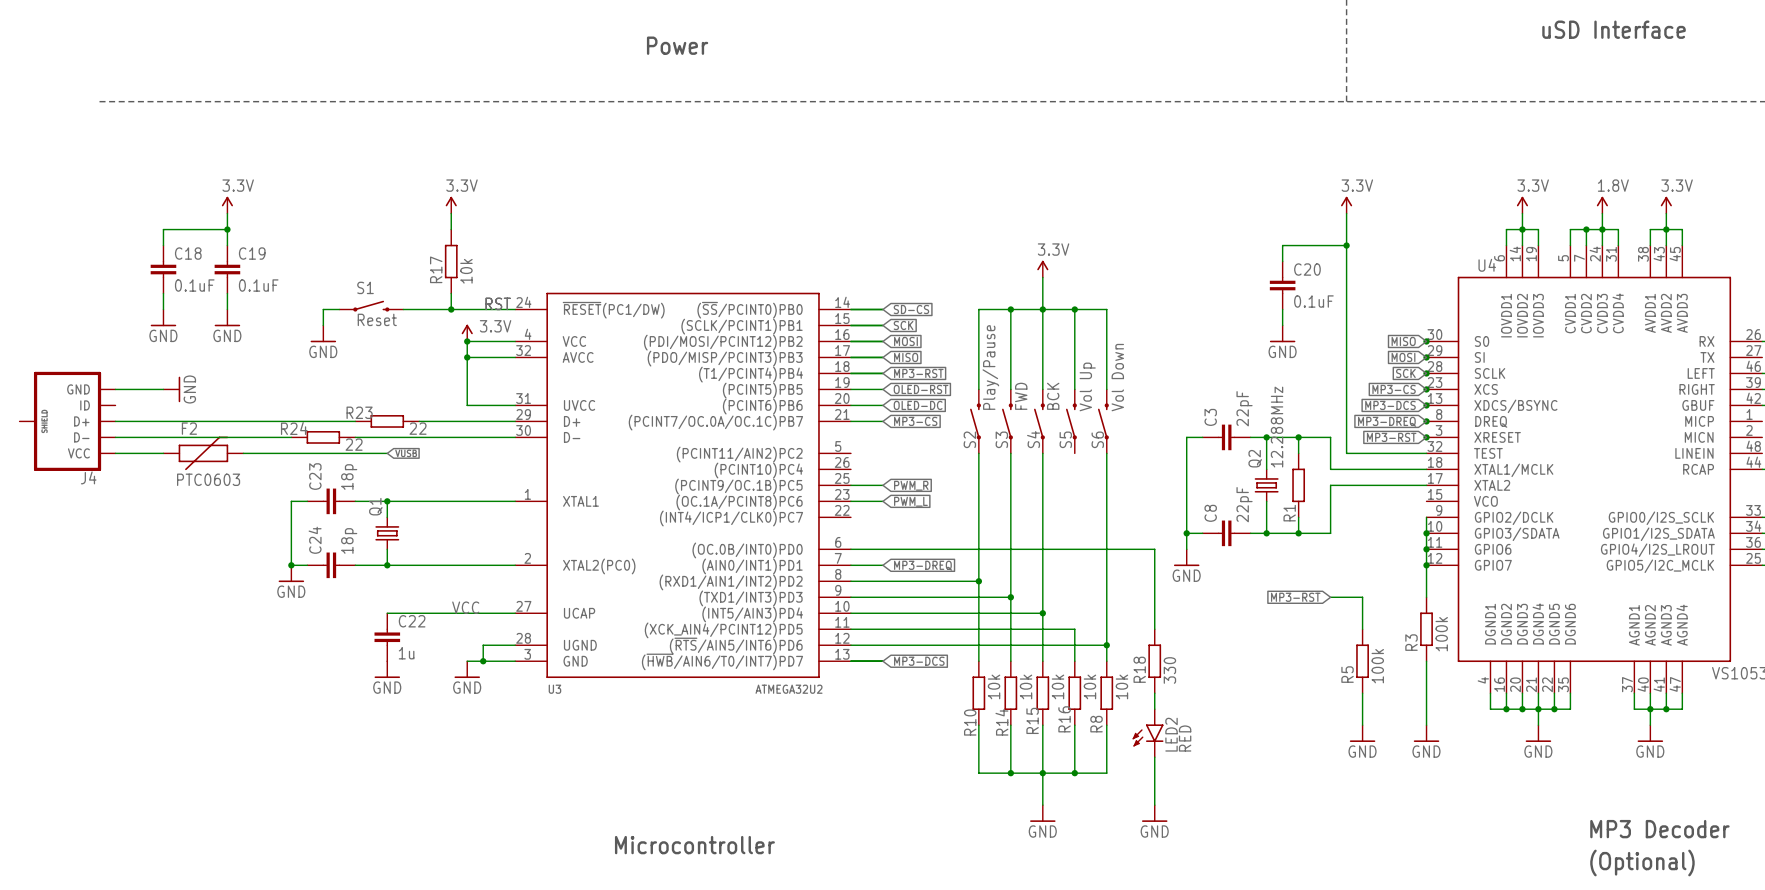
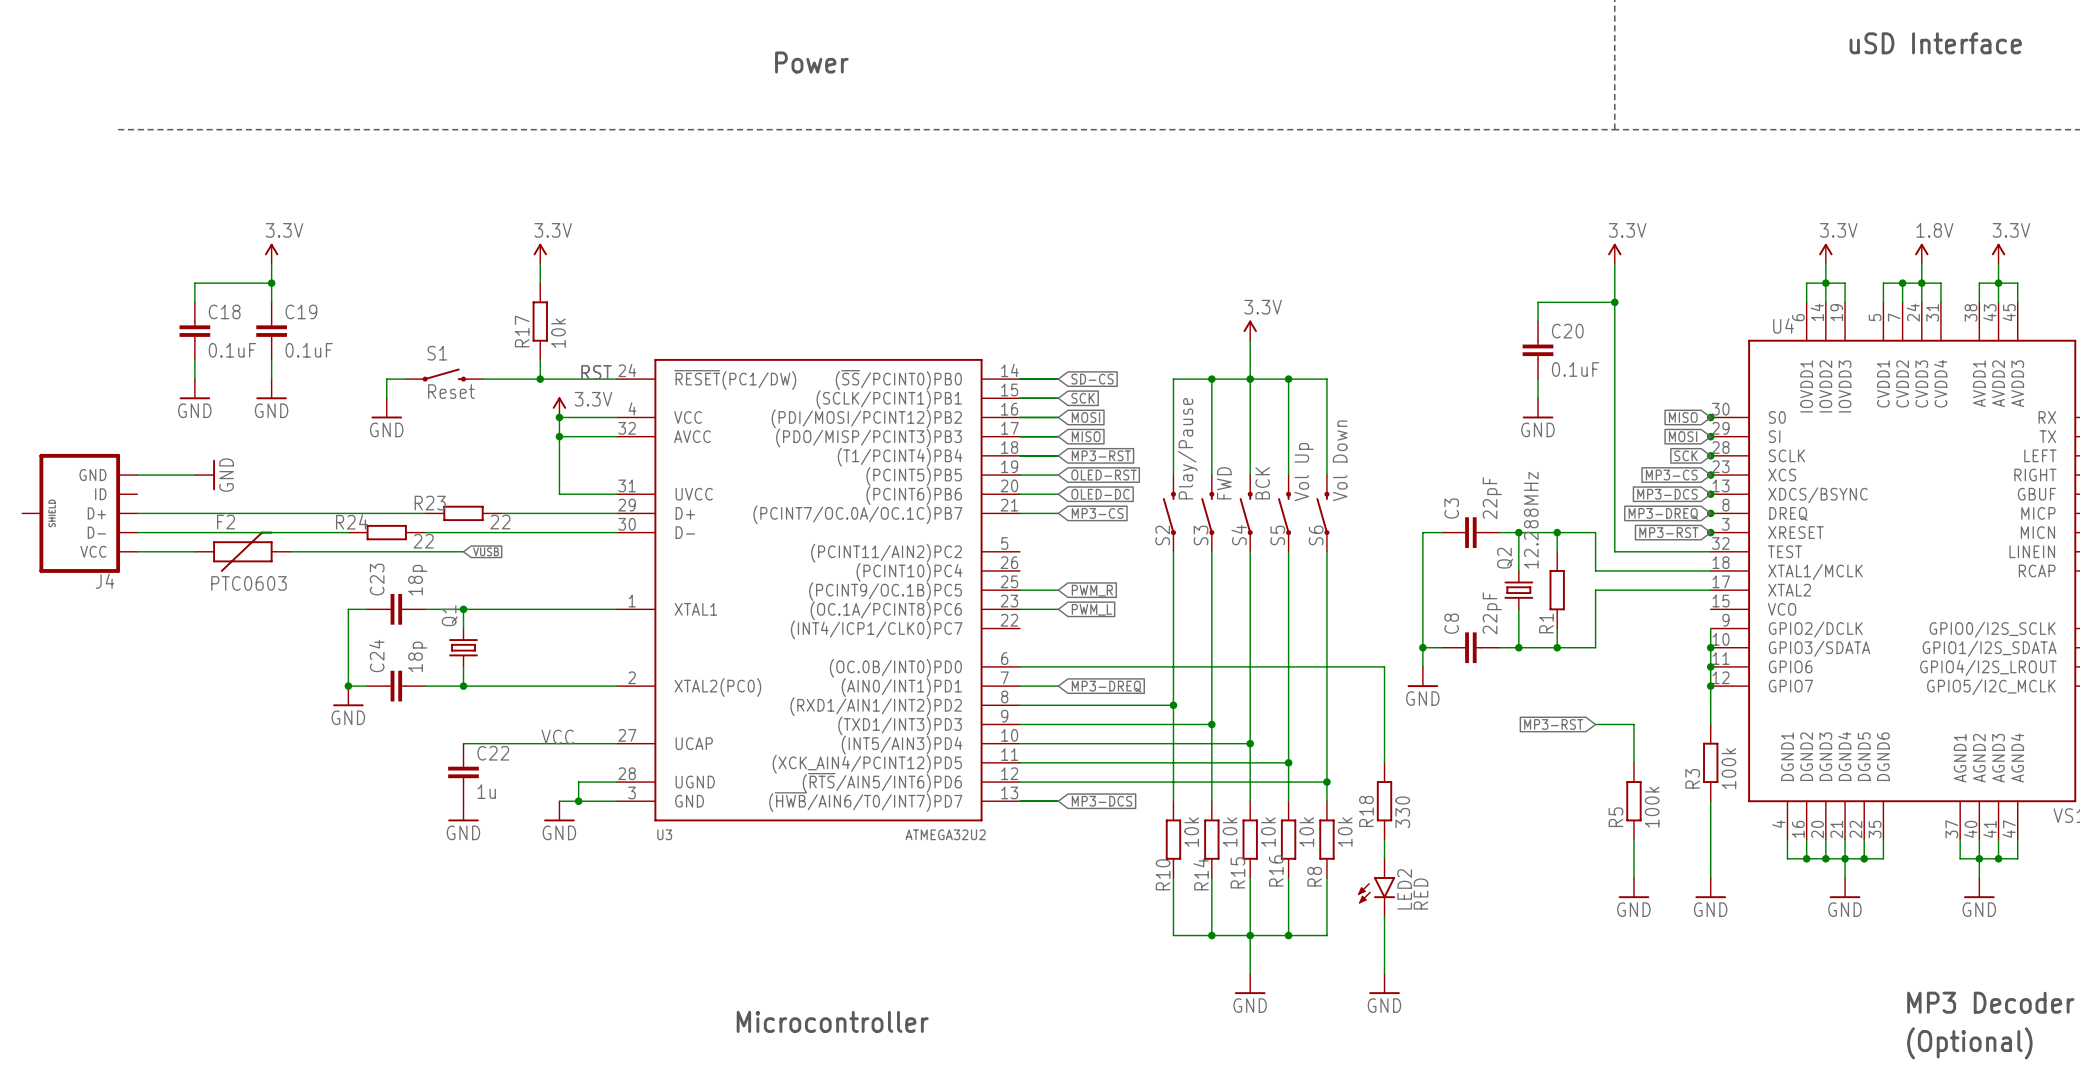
wire: none -> (1288, 551) (1288, 762)
junction: none -> (1288, 762)

